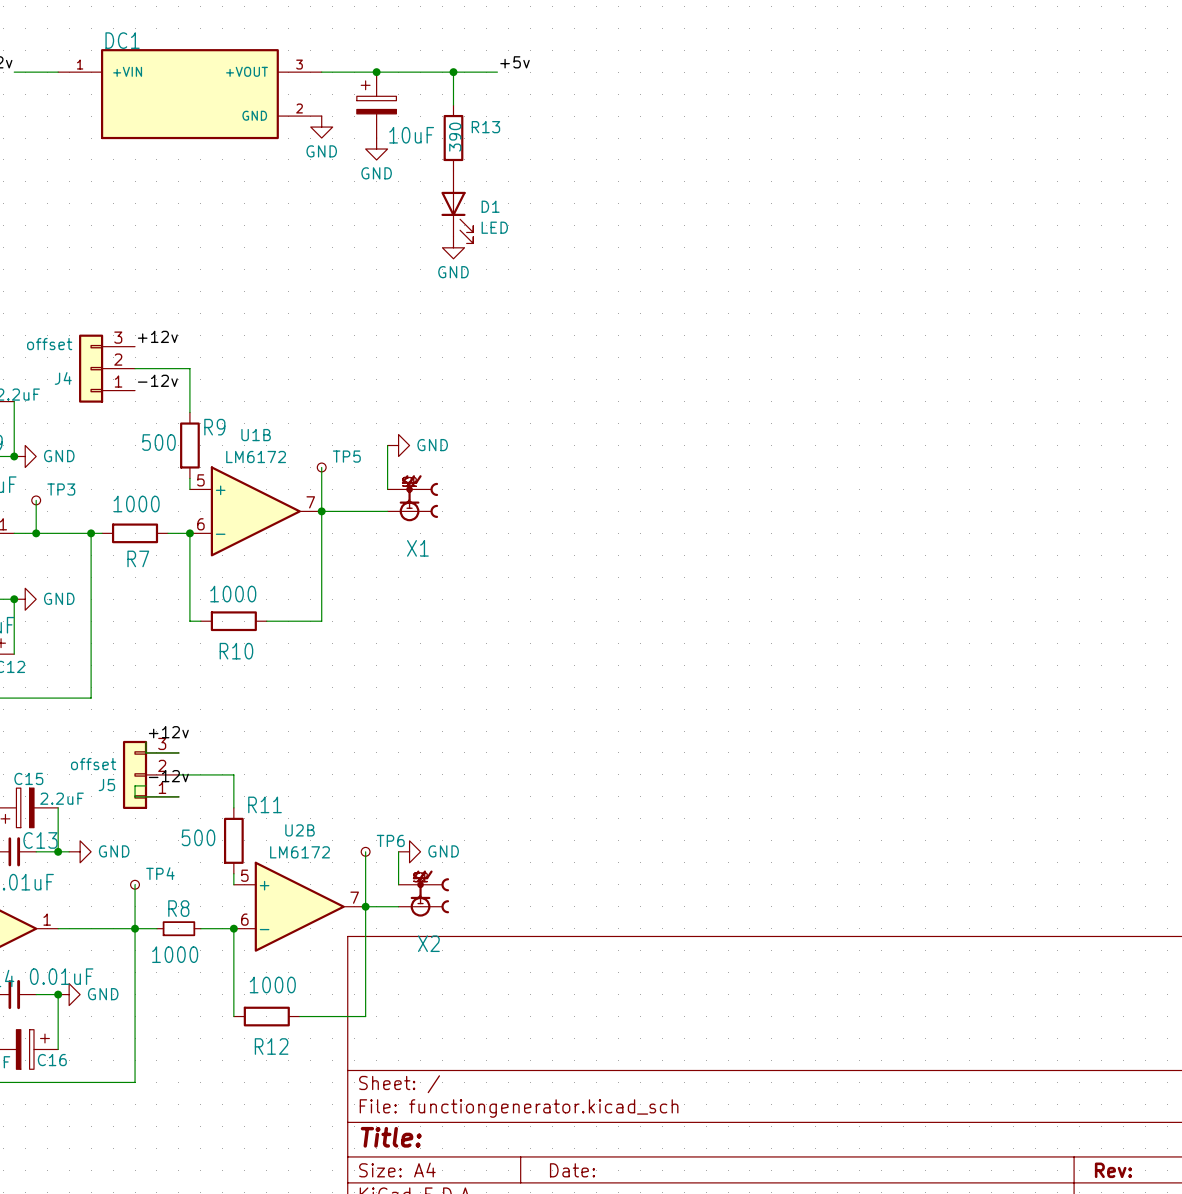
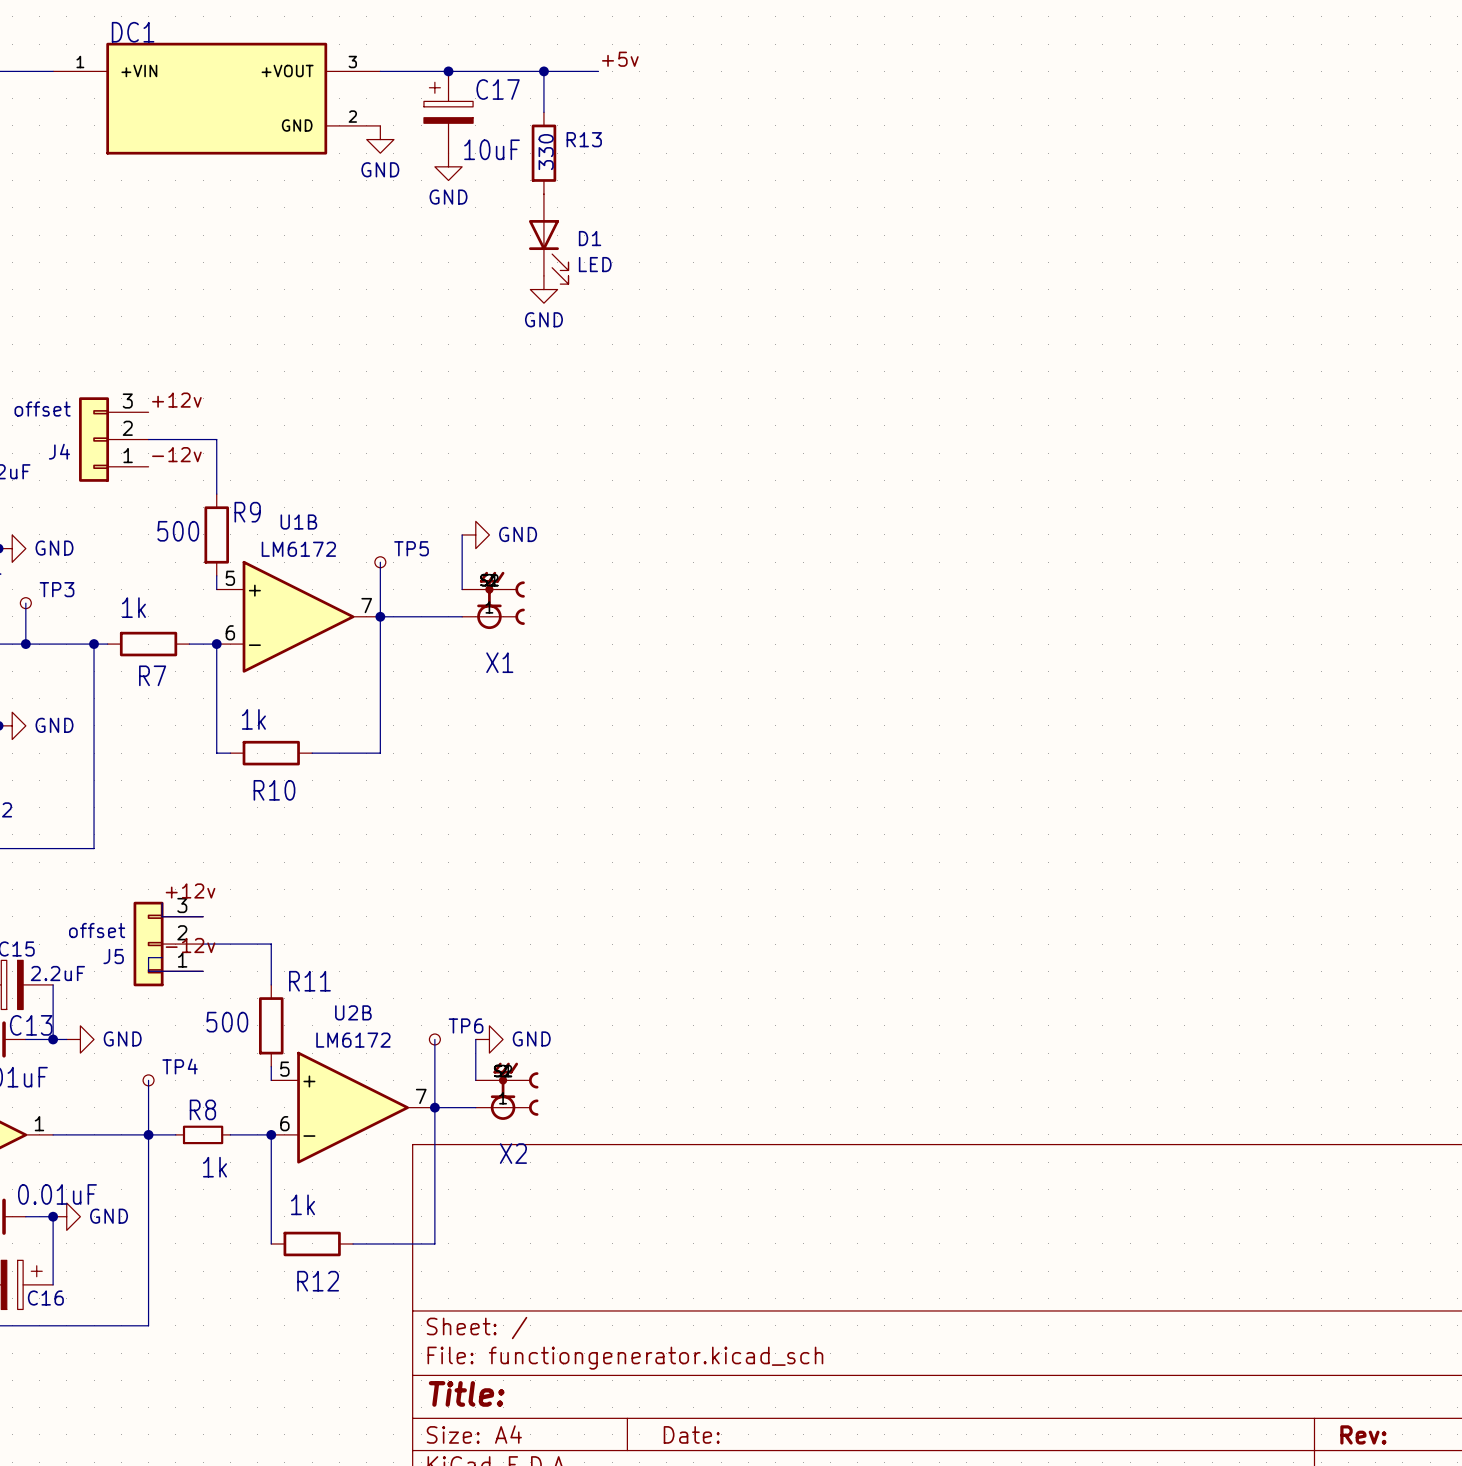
C17 name: none -> C17 (498, 89)
R13 value: 390 (455, 137) -> 330 (546, 152)
R7 value: 1000 (136, 504) -> 1k (133, 607)
R10 value: 1000 (233, 594) -> 1k (253, 719)
R8 value: 1000 (175, 954) -> 1k (214, 1167)
R12 value: 1000 (272, 985) -> 1k (303, 1204)

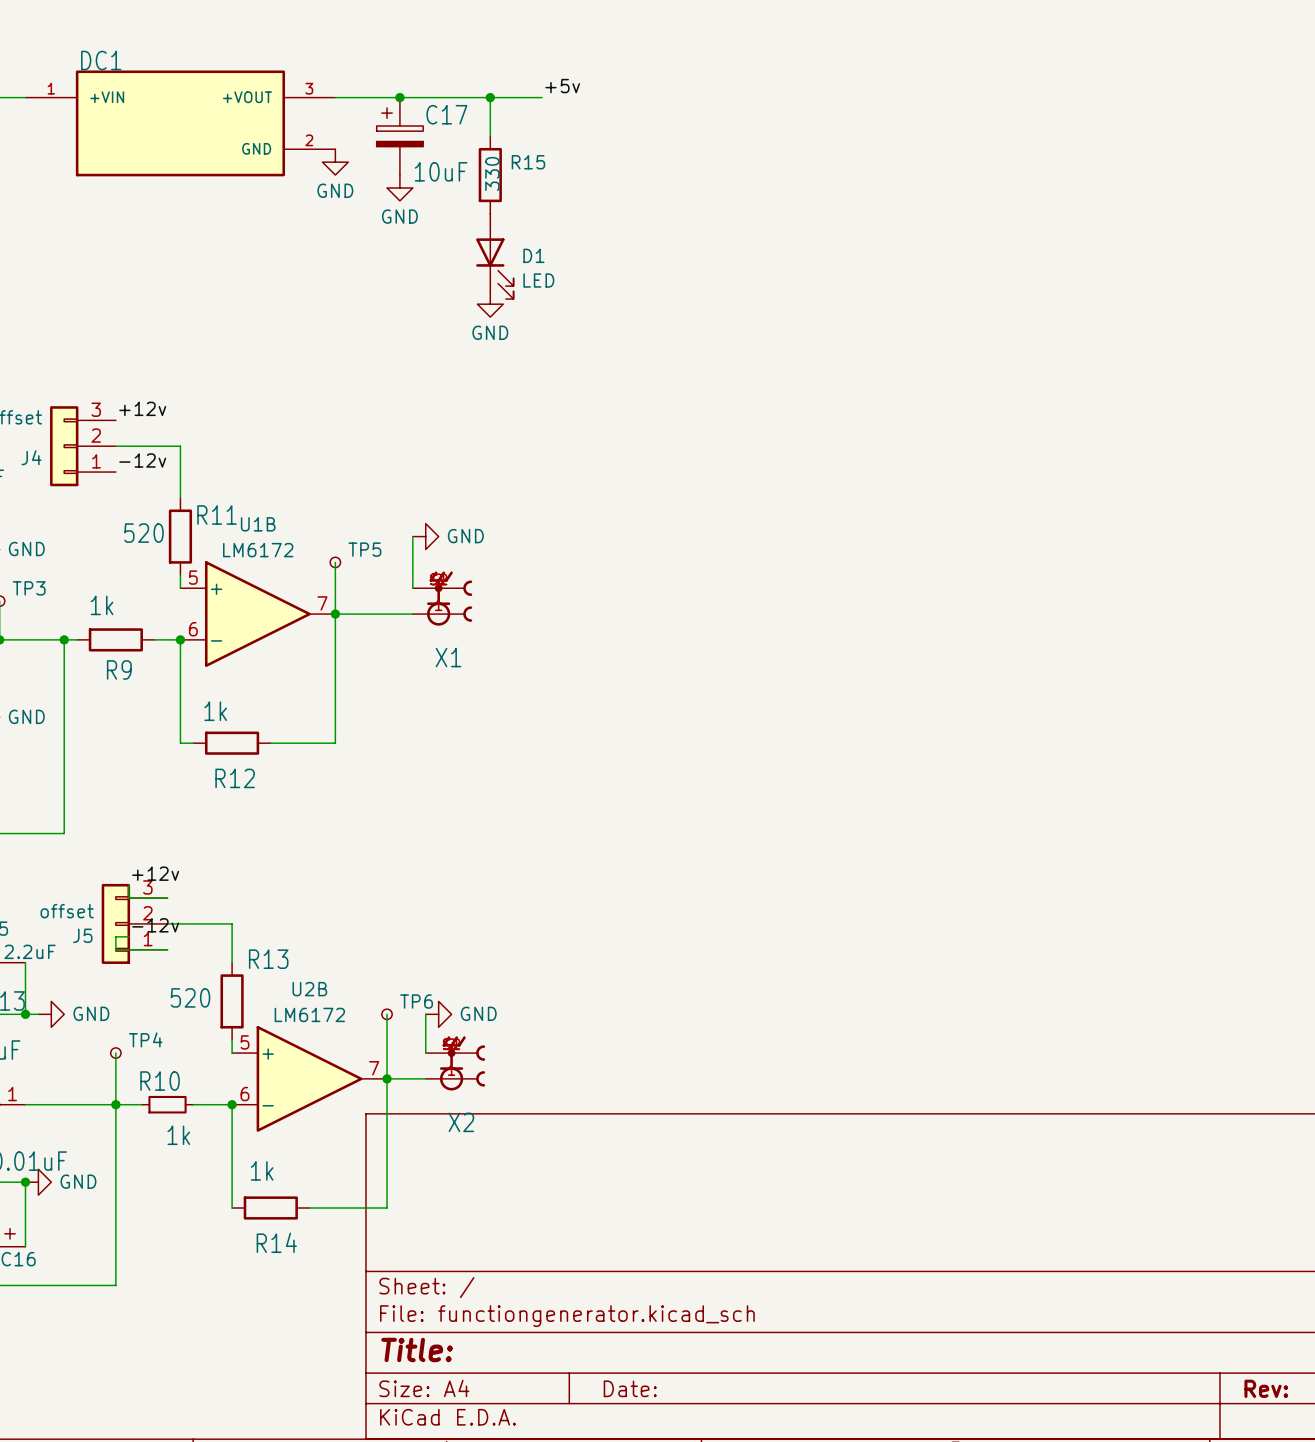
R13 name: R13 (584, 139) -> R15 (528, 162)
R9 name: R9 (247, 512) -> R11 (217, 515)
R9 value: 500 (178, 531) -> 520 (144, 533)
R7 name: R7 (152, 675) -> R9 (119, 669)
R10 name: R10 (274, 790) -> R12 (235, 778)
R11 name: R11 (309, 981) -> R13 (268, 959)
R11 value: 500 (227, 1022) -> 520 (190, 997)
R8 name: R8 (202, 1109) -> R10 (160, 1081)
R12 name: R12 (318, 1281) -> R14 (276, 1242)

